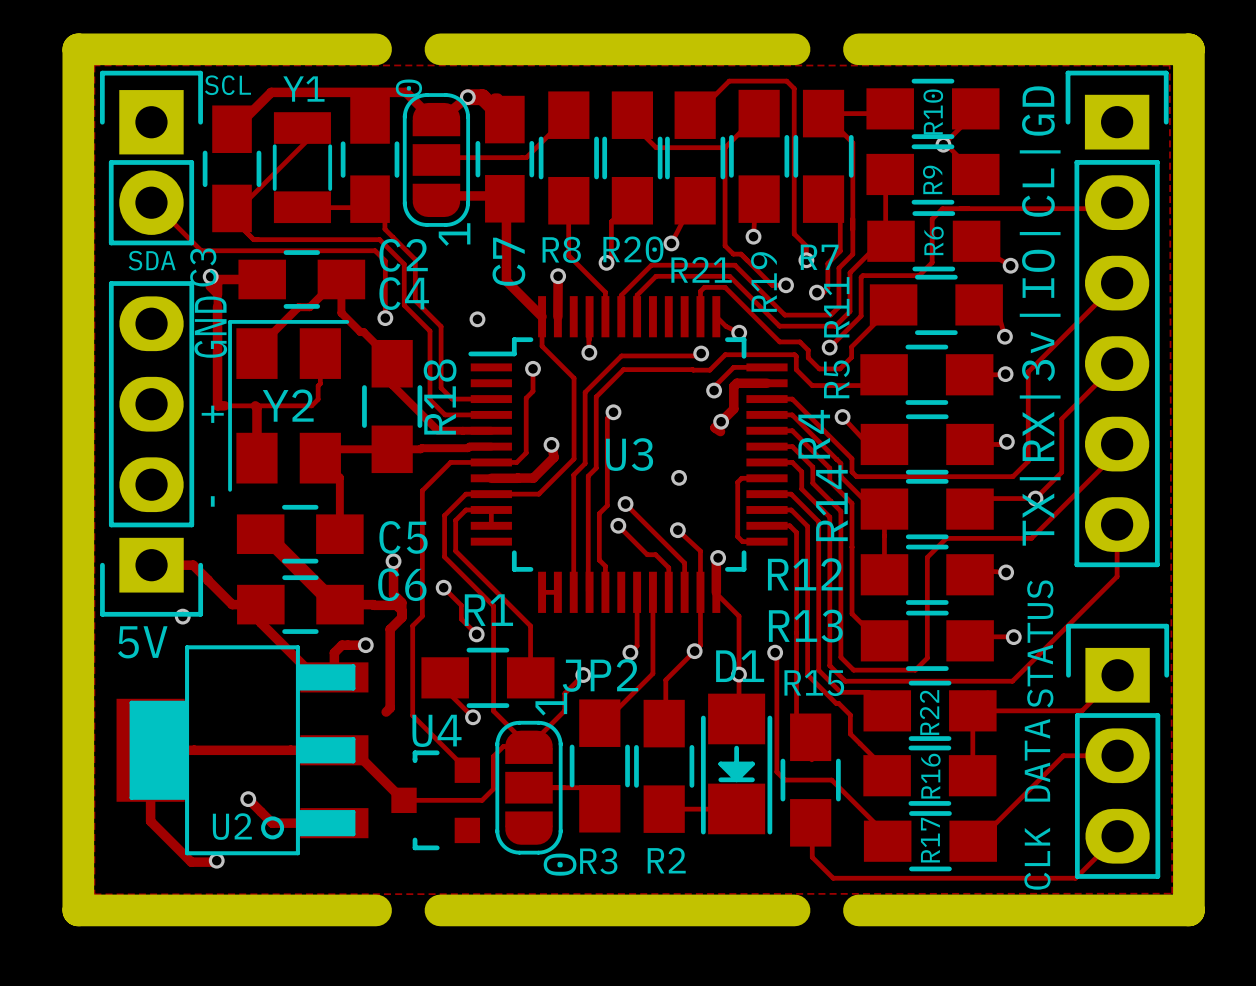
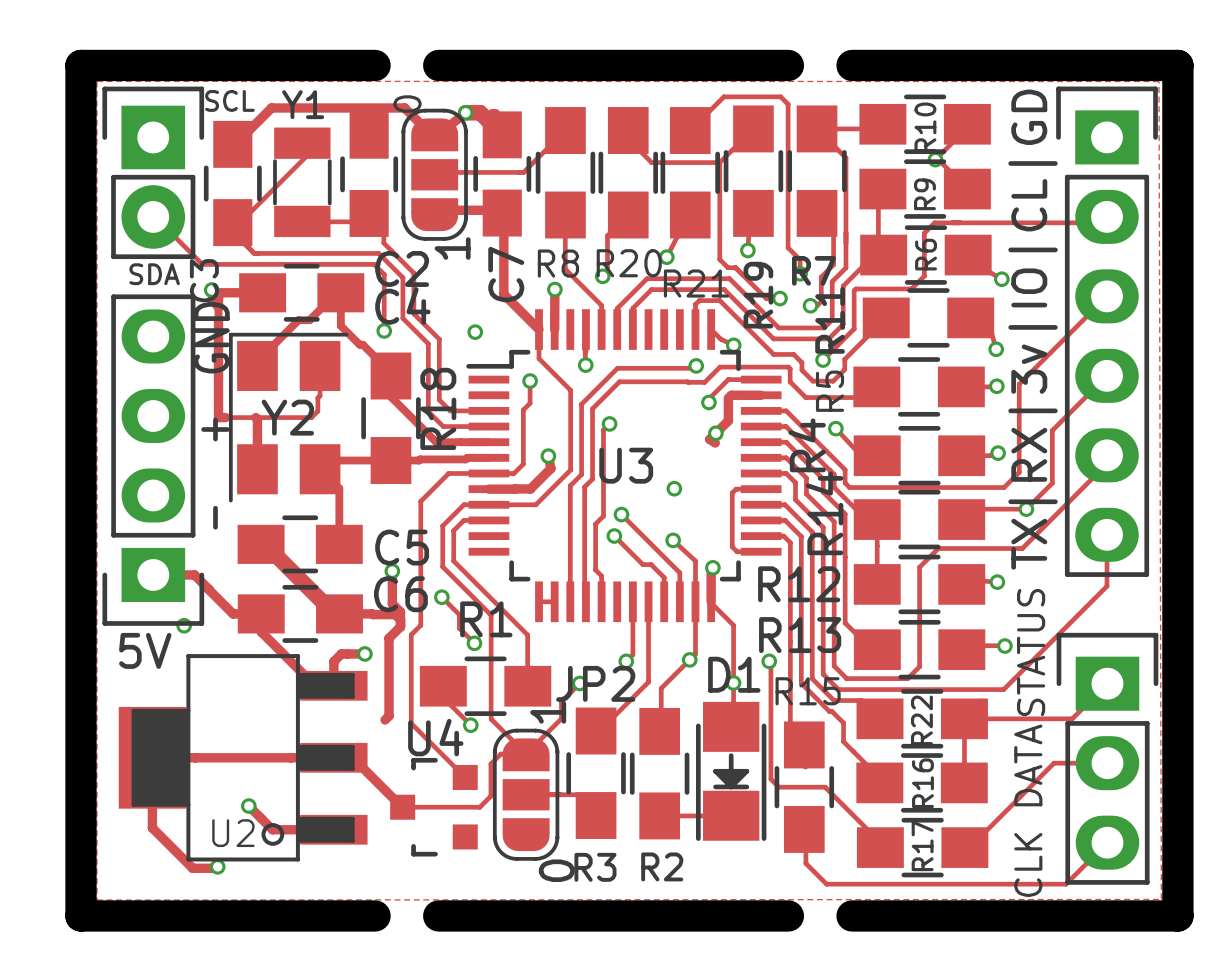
track: (491, 509) (491, 525) -> none

